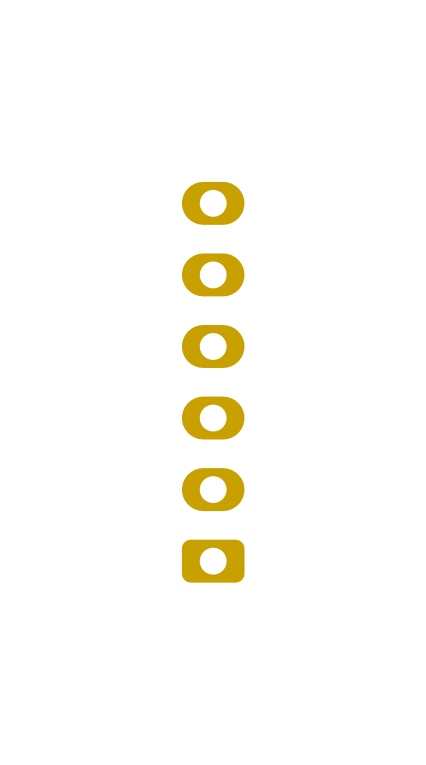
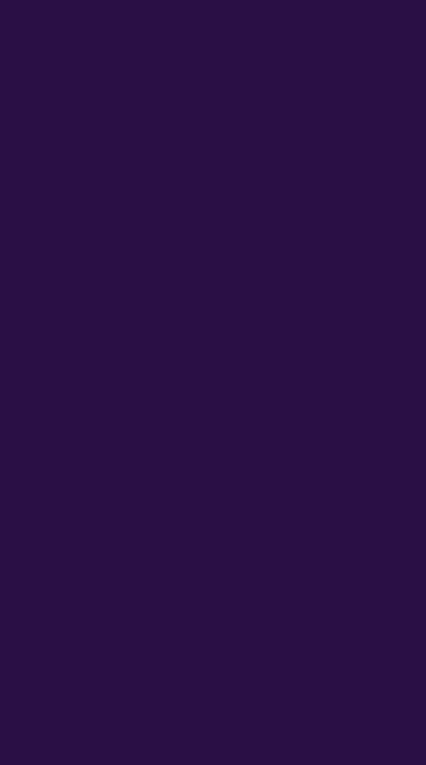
part: (213, 382) -> none

